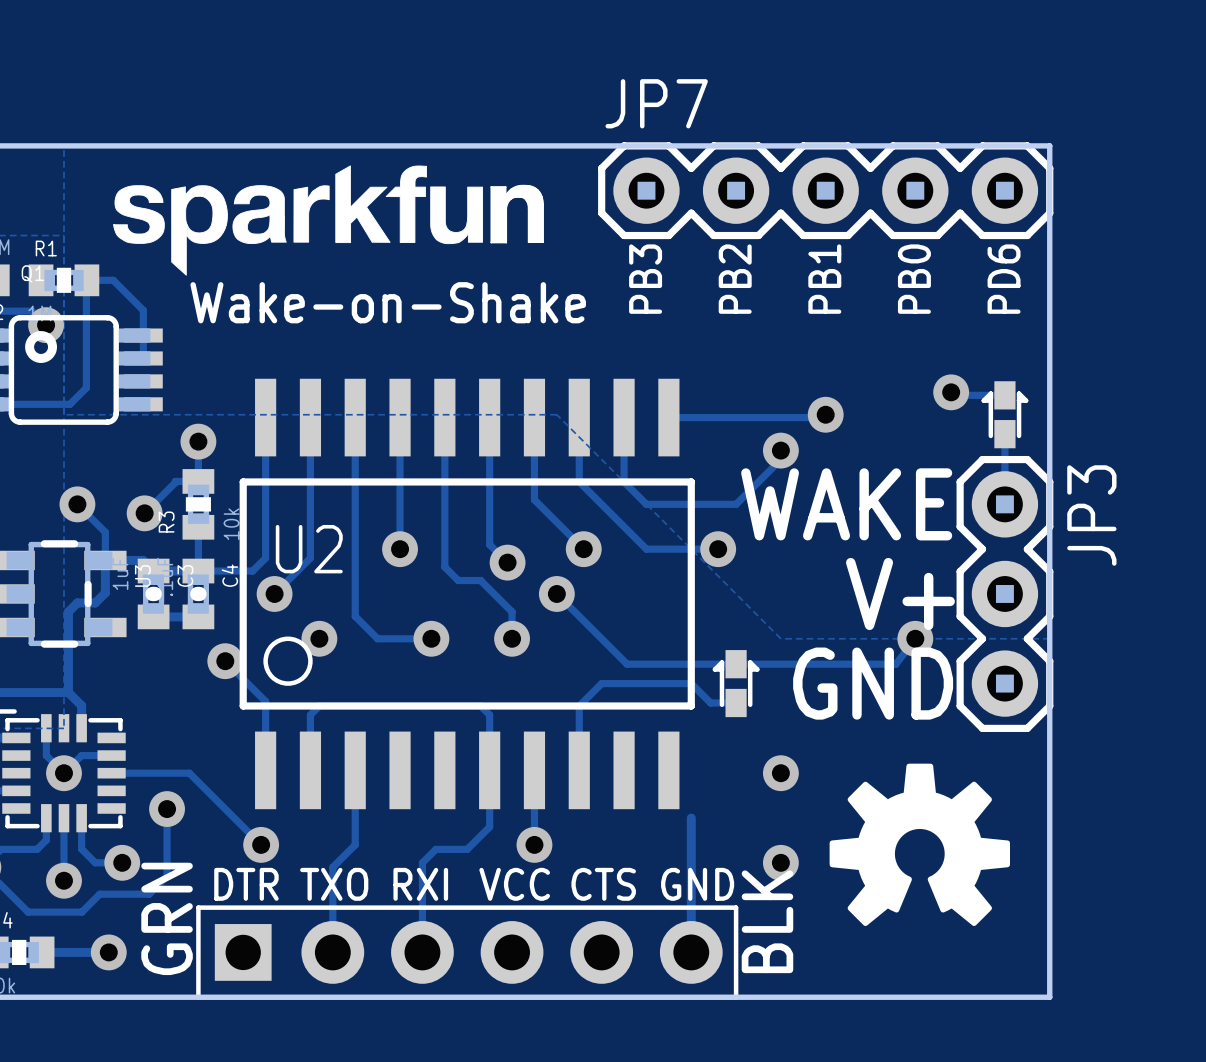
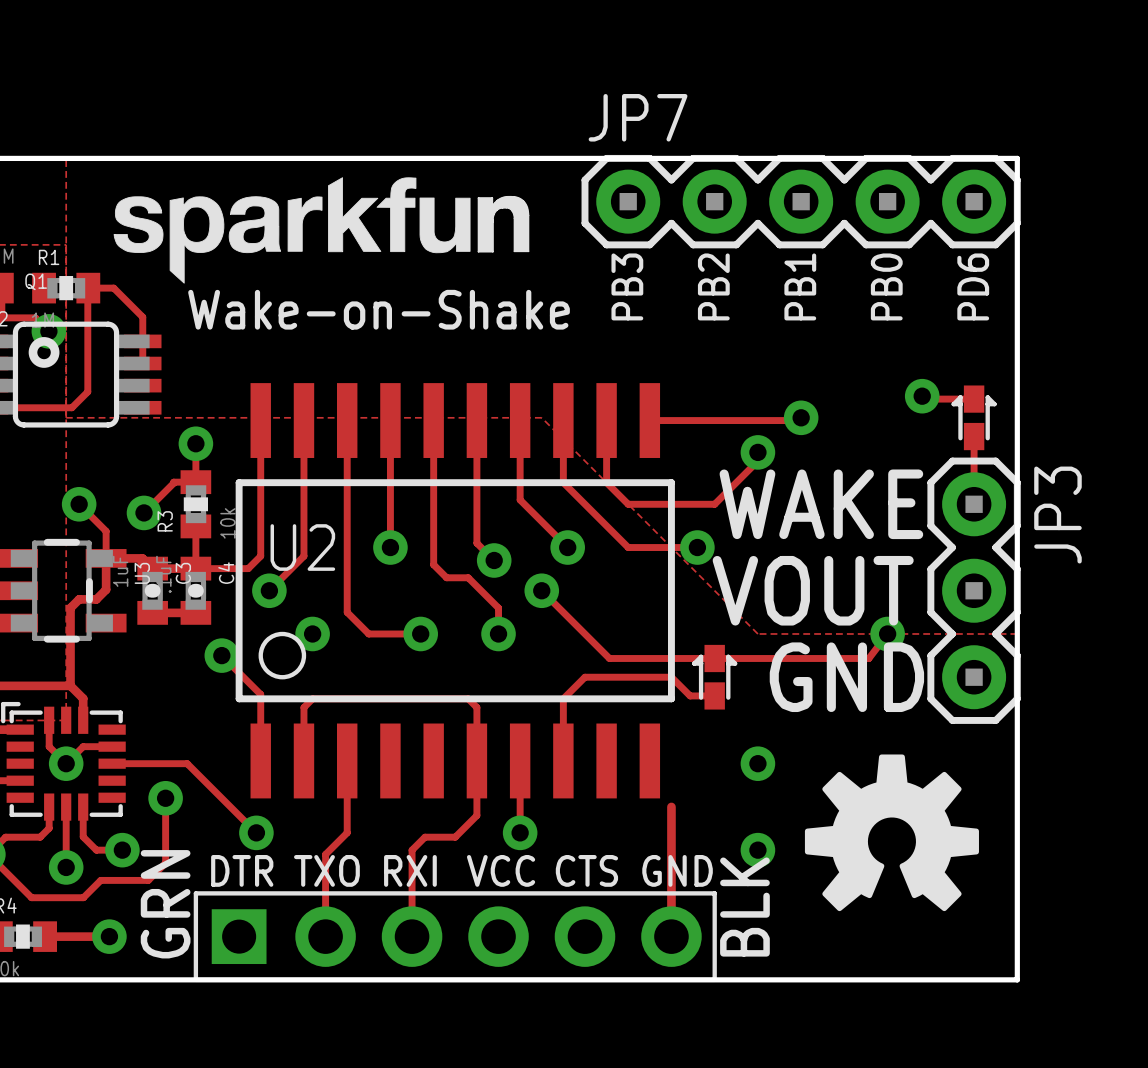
text: none -> VOUT (813, 590)
text: V+ (900, 593) -> none

